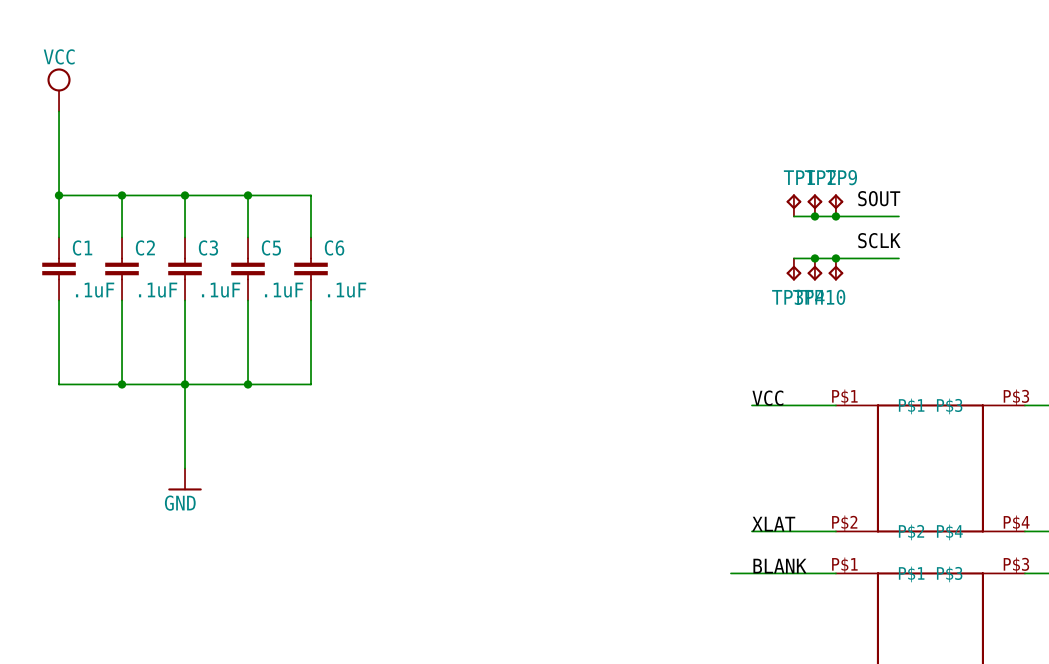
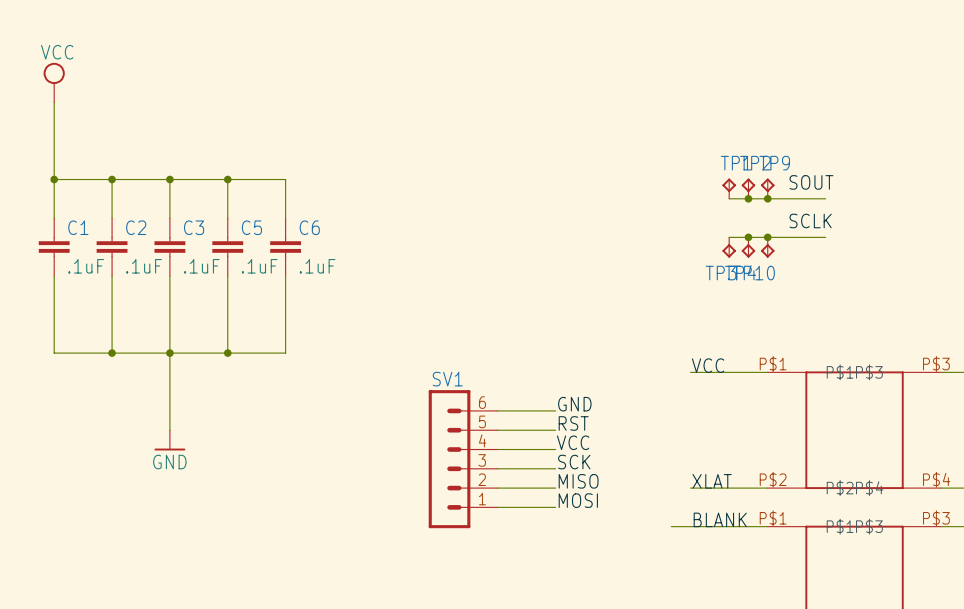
label: none -> GND (574, 404)
wire: none -> (497, 410) (555, 410)
label: none -> RST (573, 423)
wire: none -> (497, 430) (555, 430)
label: none -> VCC (573, 442)
wire: none -> (497, 449) (555, 449)
SV1: none -> (463, 459)
label: none -> SCK (574, 462)
wire: none -> (497, 468) (555, 468)
label: none -> MISO (578, 481)
wire: none -> (497, 488) (555, 488)
label: none -> MOSI (578, 500)
wire: none -> (497, 507) (555, 507)

